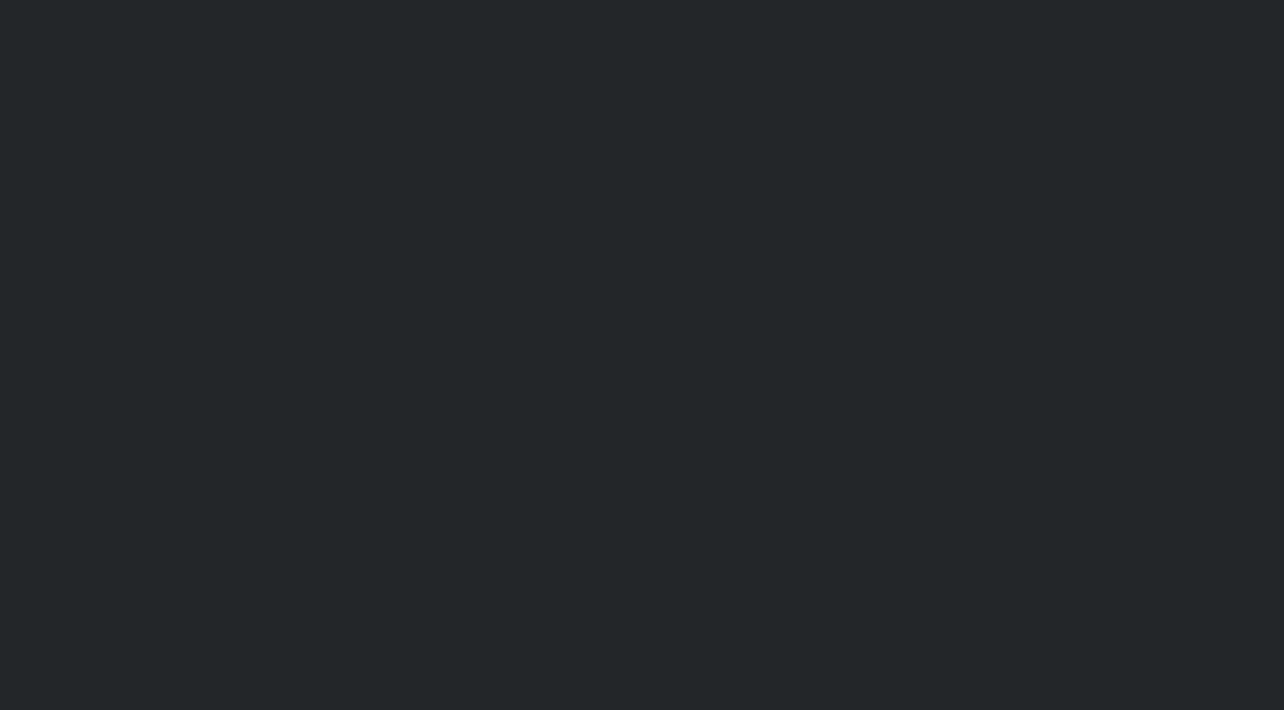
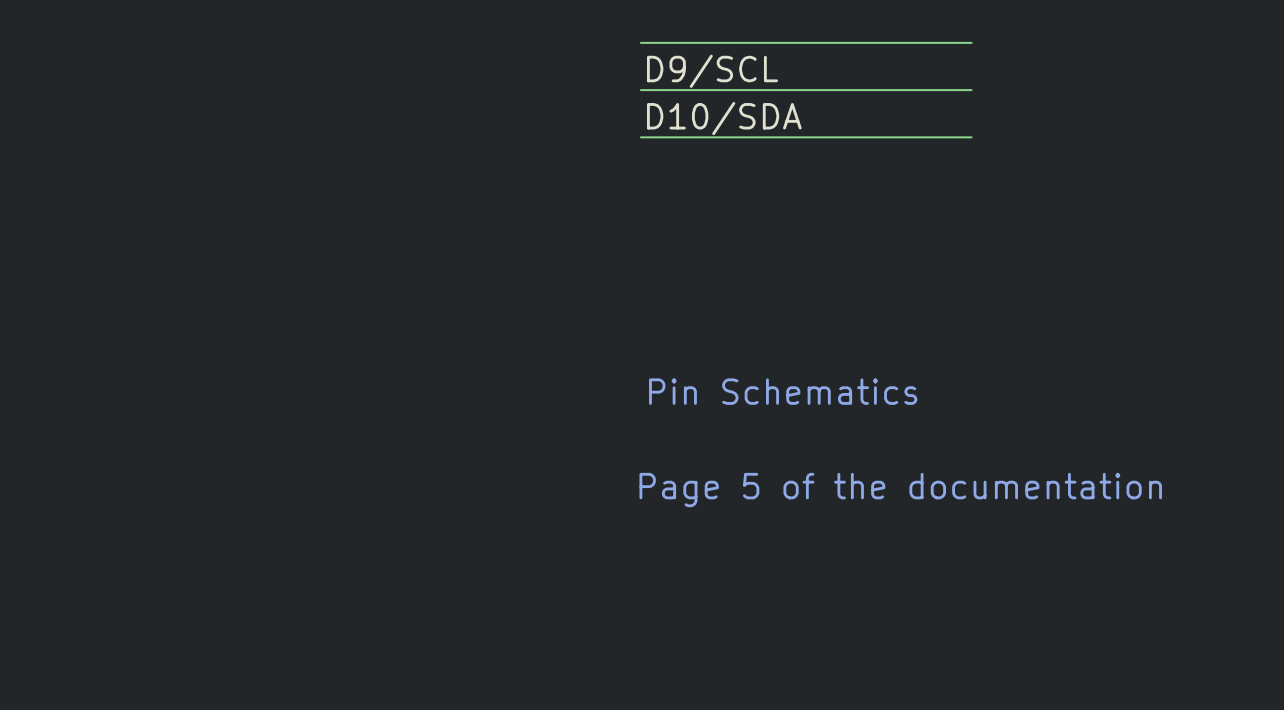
wire: none -> (640, 42) (971, 42)
label: none -> D9/SCL (712, 71)
wire: none -> (640, 90) (971, 90)
label: none -> D10/SDA (724, 118)
wire: none -> (640, 137) (971, 137)
text: none -> Pin Schematics (783, 391)
text: none -> Page 5 of the documentation (900, 490)

